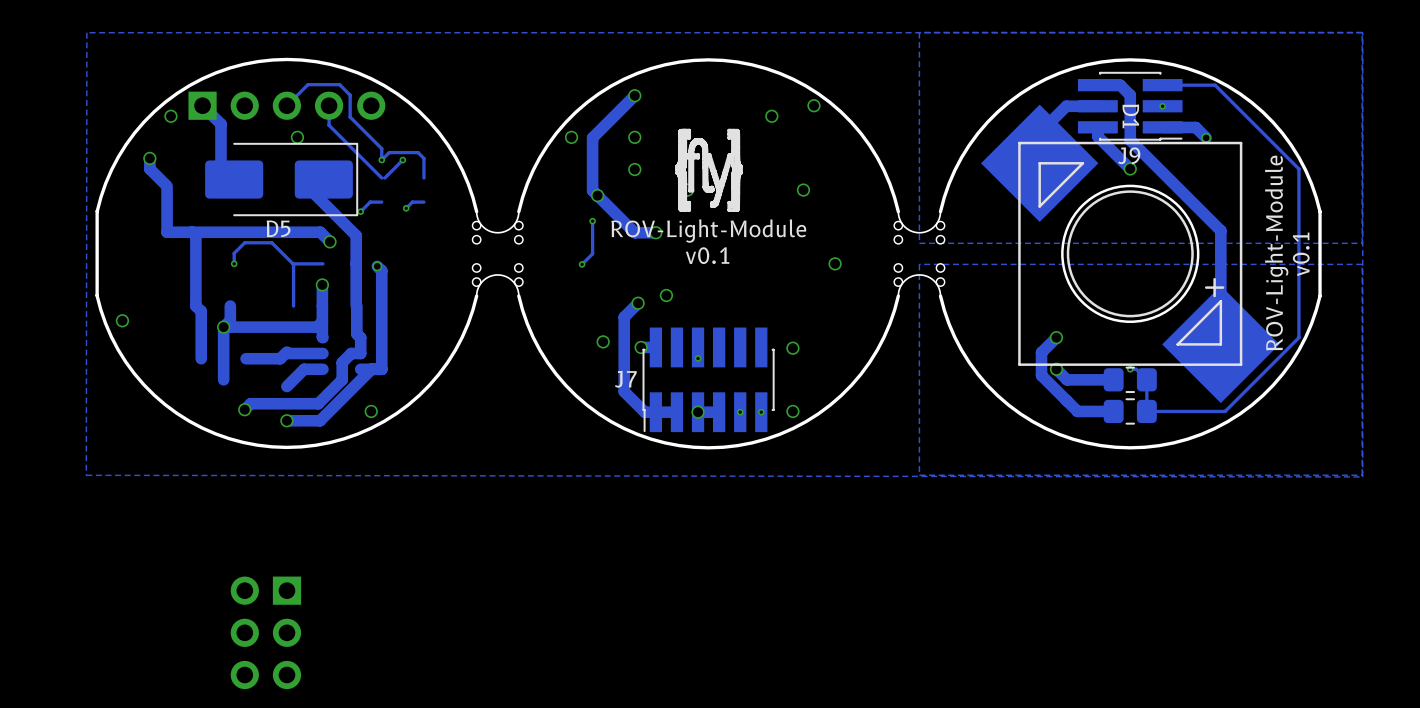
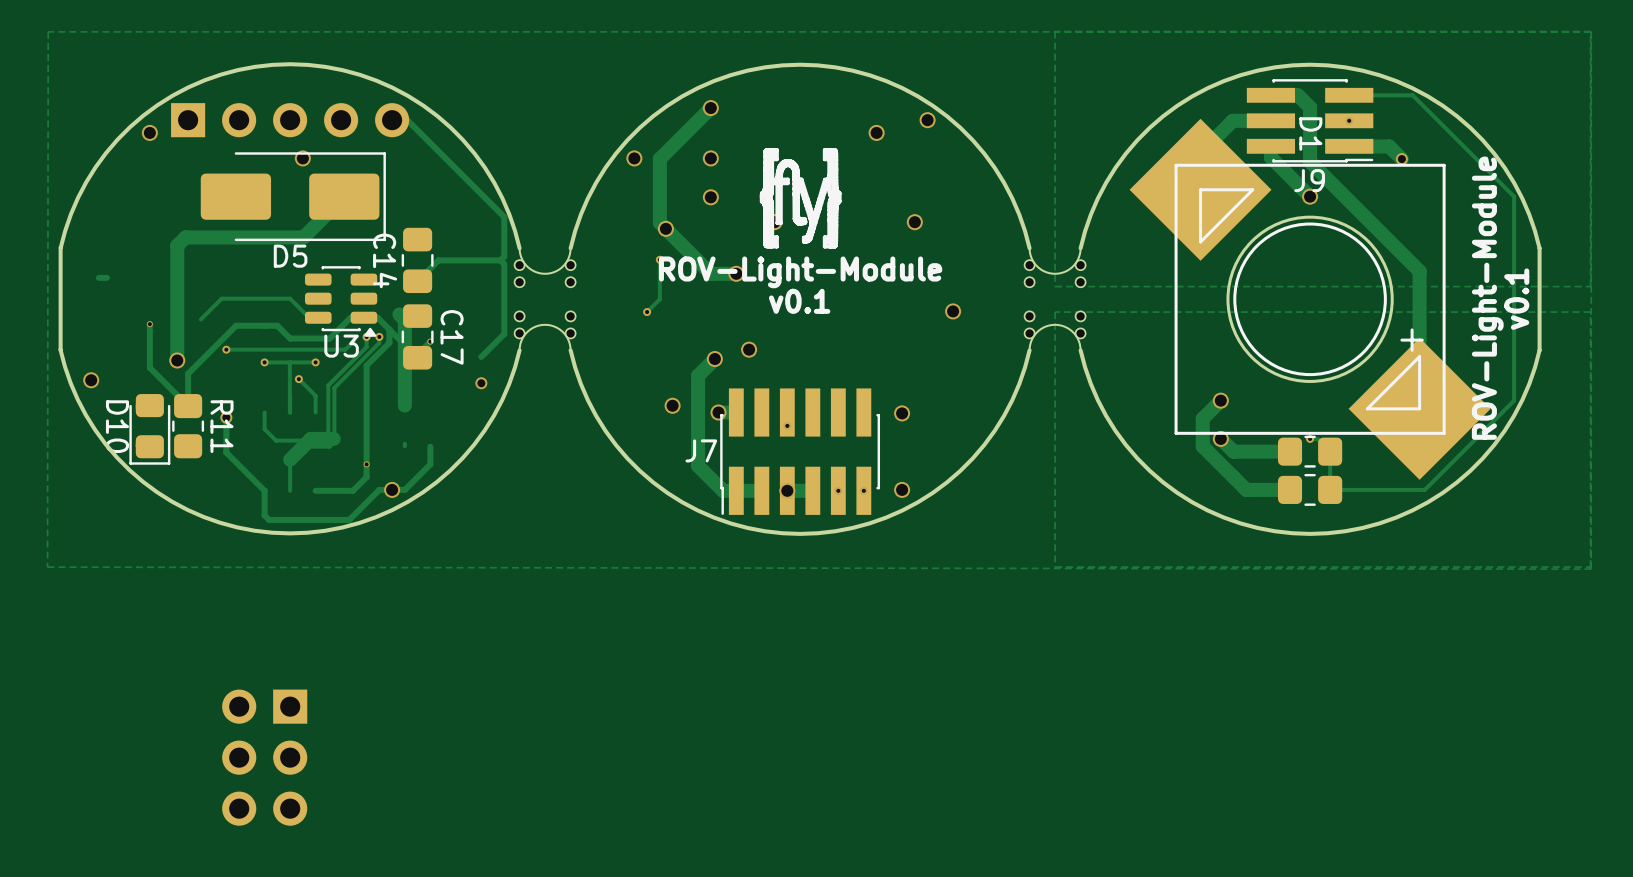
track: (202, 105) (220, 124) (220, 179) -> none
track: (286, 105) (307, 84) (339, 84) (350, 95) (350, 117) (381, 148) (381, 160) (389, 152) (418, 152) (423, 158) (423, 178) -> none
track: (329, 105) (329, 125) (381, 178) -> none
track: none -> (392, 120) (407, 120) (504, 217) (504, 256) (500, 260)
track: (149, 158) (149, 168) (167, 186) -> none
via: (149, 158) -> none
via: (381, 160) -> none
track: (402, 160) (384, 178) -> none
via: (402, 160) -> none
track: none -> (344, 196) (303, 237) (185, 237) (177, 245) (177, 360)
D5 position: (281, 179) -> (293, 196)
track: (167, 190) (167, 232) (320, 232) (329, 241) -> none
track: (310, 190) (356, 235) (356, 305) -> none
track: (381, 202) (370, 202) (360, 211) -> none
track: (423, 202) (412, 202) (406, 208) -> none
via: (406, 208) -> none
via: (360, 211) -> none
C14: none -> (417, 260)
track: none -> (500, 260) (438, 260) (417, 281)
track: none -> (500, 260) (504, 264) (504, 334) (481, 356)
track: (192, 232) (195, 236) (195, 306) (201, 311) (201, 358) -> none
track: none -> (106, 277) (98, 277)
via: (329, 241) -> none
U3: none -> (341, 301)
via: (234, 263) -> none
track: (323, 263) (292, 263) (271, 242) (244, 242) (234, 253) (234, 263) -> none
track: (293, 264) (293, 306) -> none
via: (377, 266) -> none
track: none -> (309, 317) (290, 298) (221, 298) (200, 319)
track: none -> (149, 324) (149, 367) (188, 406) (188, 373) (236, 325) (277, 325) (290, 338) (329, 338) (350, 317) (377, 317) (417, 357) (417, 354) (430, 341)
via: none -> (149, 324)
track: none -> (389, 329) (389, 342) (366, 365) (366, 477) (352, 490) (315, 490)
track: (322, 284) (322, 337) -> none
via: (322, 284) -> none
track: none -> (353, 336) (353, 341) (345, 349) (226, 349)
track: none -> (366, 336) (366, 347) (328, 385) (328, 438) (326, 440) (276, 440) (264, 429) (264, 412)
via: none -> (366, 336)
track: none -> (379, 336) (379, 342) (334, 387) (334, 441) (329, 446) (306, 446) (290, 462) (290, 490)
via: none -> (379, 336)
C17: none -> (417, 336)
via: none -> (430, 341)
via: none -> (226, 349)
track: (230, 306) (230, 320) (223, 327) -> none
via: none -> (264, 362)
track: none -> (289, 362) (289, 412)
track: none -> (315, 362) (264, 362)
via: none -> (315, 362)
track: (356, 306) (356, 333) (360, 337) (360, 353) (351, 353) (342, 362) (342, 379) (318, 403) (250, 403) (244, 409) -> none
track: none -> (298, 379) (315, 395) (315, 412)
via: none -> (298, 379)
track: (322, 321) (317, 327) (223, 327) -> none
via: none -> (481, 383)
track: (223, 327) (223, 379) -> none
via position: (223, 327) -> (177, 360)
track: (381, 343) (381, 369) (360, 369) -> none
track: none -> (226, 417) (226, 452) (264, 490) (264, 515) (269, 519) (349, 519) (379, 489) (404, 489) (430, 464) (430, 446)
via: none -> (226, 417)
track: (286, 352) (280, 358) (246, 358) -> none
track: (322, 353) (288, 353) -> none
R11: none -> (188, 426)
D10: none -> (149, 429)
track: (371, 369) (320, 420) (286, 420) -> none
track: none -> (404, 443) (404, 446)
via: none -> (366, 464)
via: (244, 409) -> none
via: (286, 420) -> none

